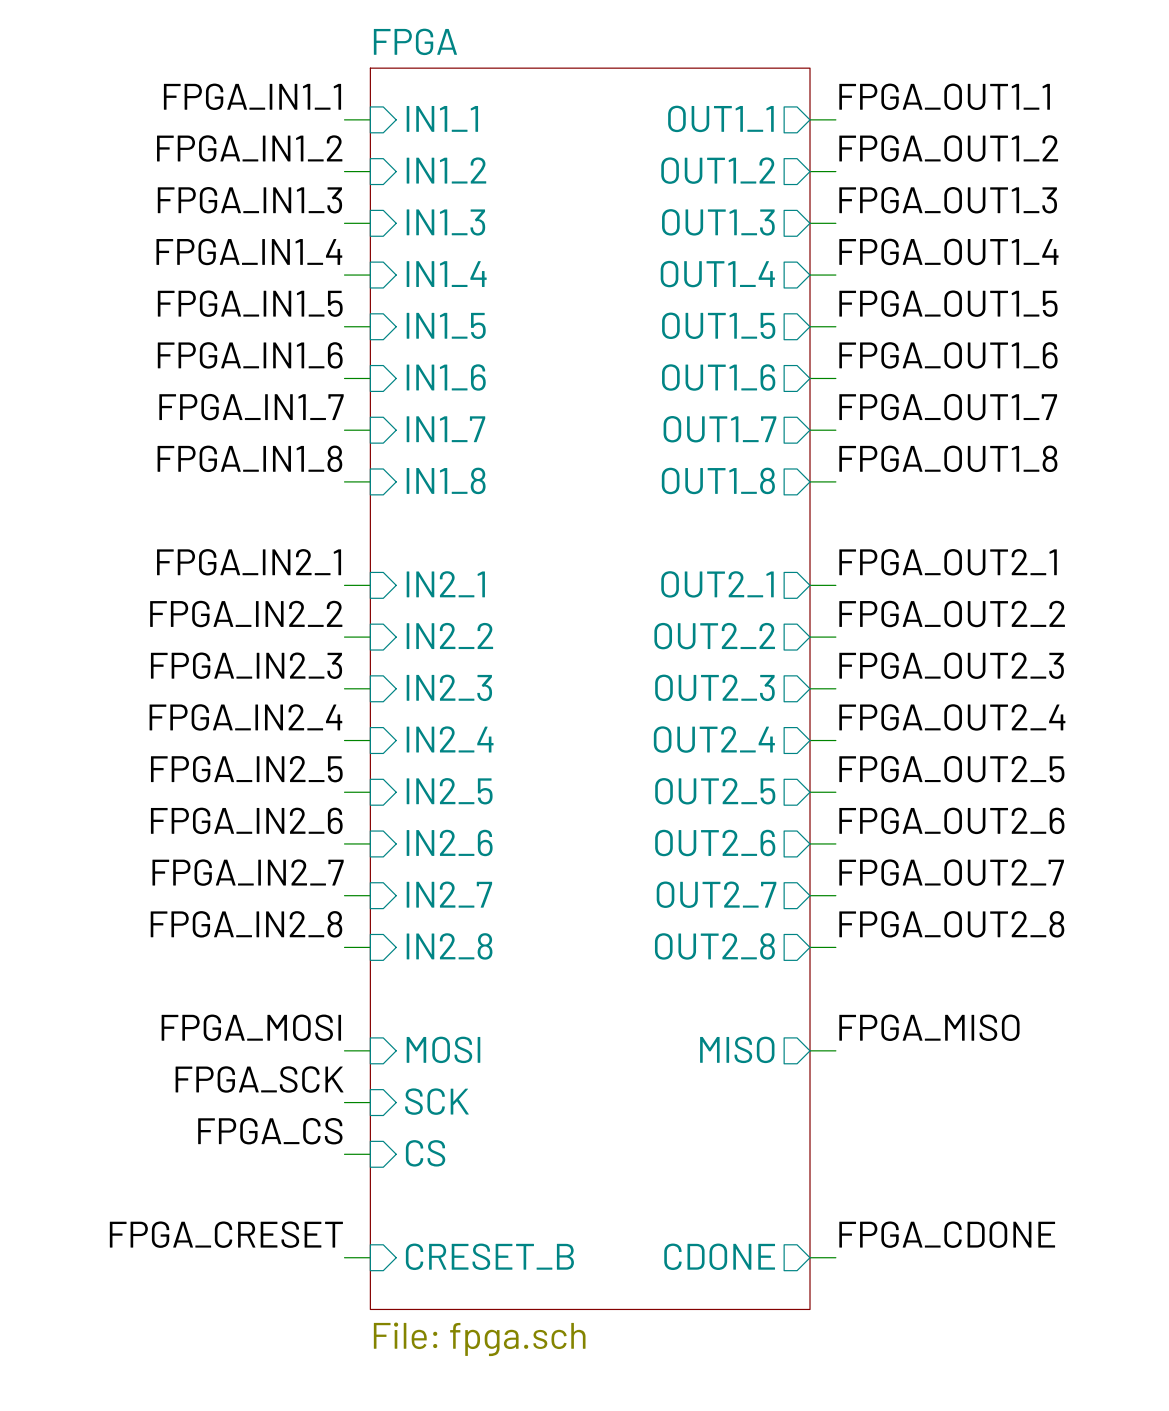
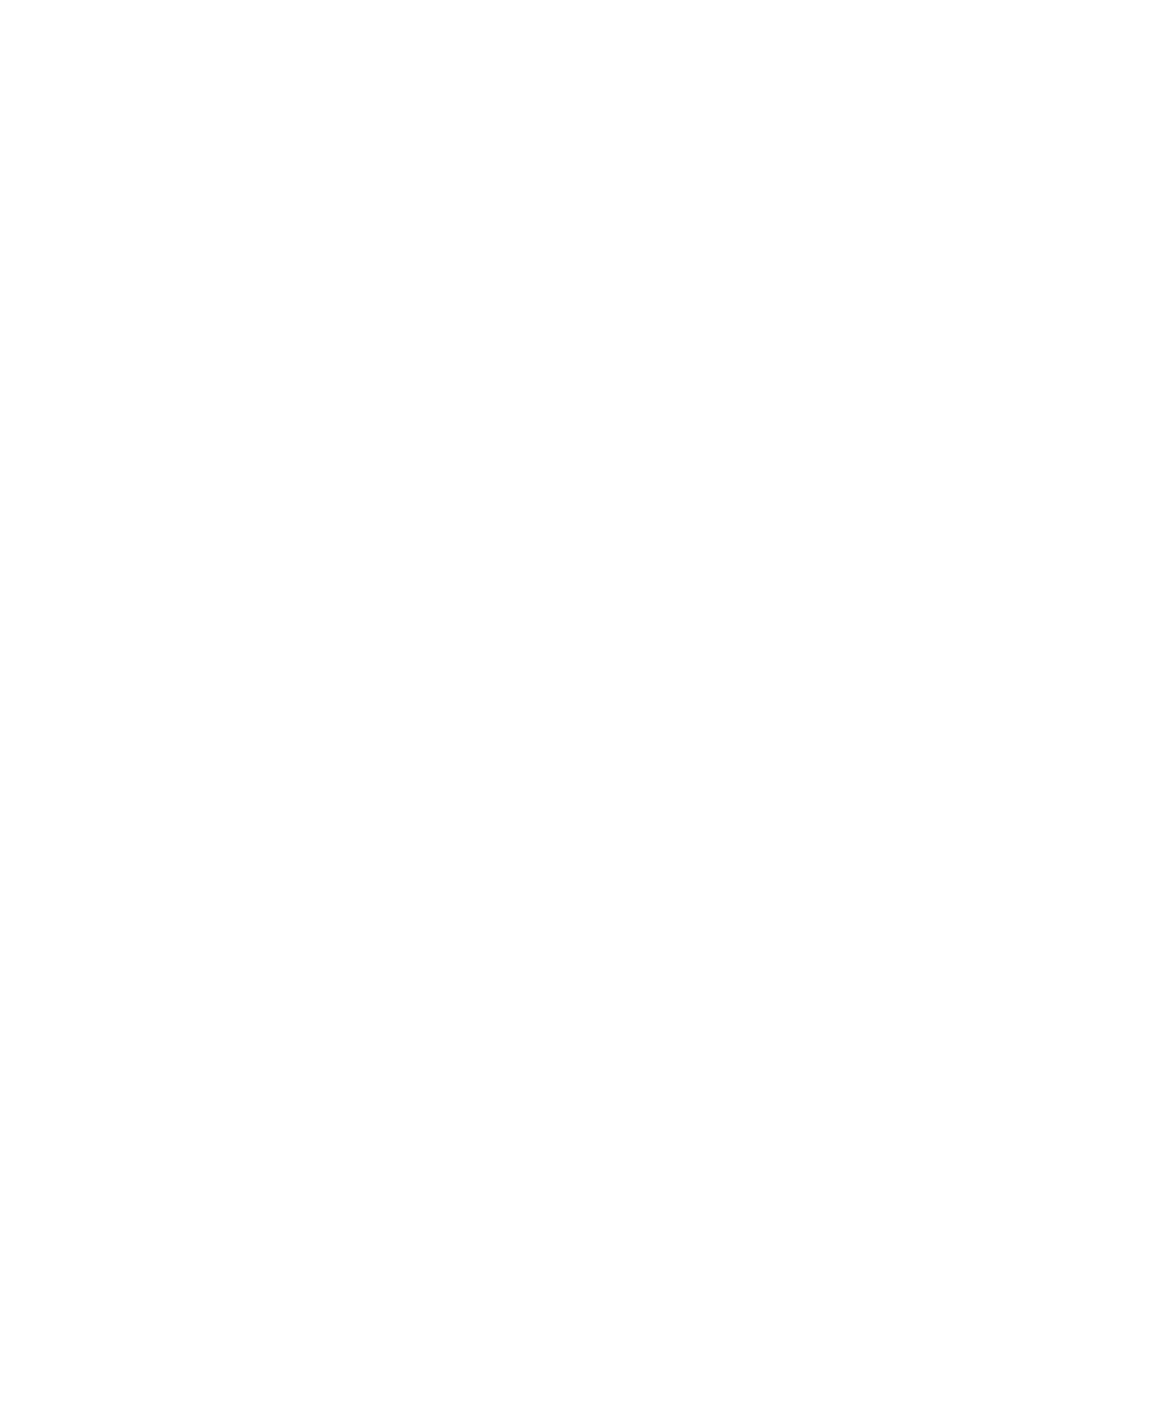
label: FPGA_IN1_1 (252, 96) -> none
label: FPGA_OUT1_1 (944, 96) -> none
sheet pin: IN1_1 (442, 118) -> none
sheet pin: OUT1_1 (720, 118) -> none
wire: (344, 119) (370, 119) -> none
wire: (810, 119) (835, 119) -> none
label: FPGA_IN1_2 (249, 148) -> none
label: FPGA_OUT1_2 (948, 148) -> none
sheet pin: IN1_2 (446, 170) -> none
sheet pin: OUT1_2 (718, 170) -> none
wire: (344, 171) (370, 171) -> none
wire: (810, 171) (835, 171) -> none
label: FPGA_IN1_3 (249, 200) -> none
label: FPGA_OUT1_3 (948, 200) -> none
sheet pin: IN1_3 (445, 222) -> none
sheet pin: OUT1_3 (718, 222) -> none
wire: (344, 223) (370, 223) -> none
wire: (810, 223) (835, 223) -> none
label: FPGA_IN1_4 (249, 251) -> none
label: FPGA_OUT1_4 (948, 251) -> none
sheet pin: IN1_4 (446, 274) -> none
sheet pin: OUT1_4 (717, 274) -> none
wire: (344, 275) (370, 275) -> none
wire: (810, 275) (835, 275) -> none
label: FPGA_IN1_5 (250, 303) -> none
label: FPGA_OUT1_5 (948, 303) -> none
sheet pin: IN1_5 (446, 325) -> none
sheet pin: OUT1_5 (718, 325) -> none
wire: (344, 326) (370, 326) -> none
wire: (810, 326) (835, 326) -> none
label: FPGA_IN1_6 (250, 355) -> none
label: FPGA_OUT1_6 (948, 355) -> none
sheet pin: IN1_6 (446, 377) -> none
sheet pin: OUT1_6 (718, 377) -> none
wire: (344, 378) (370, 378) -> none
wire: (810, 378) (835, 378) -> none
label: FPGA_IN1_7 (251, 407) -> none
label: FPGA_OUT1_7 (948, 407) -> none
sheet pin: IN1_7 (445, 429) -> none
sheet pin: OUT1_7 (719, 429) -> none
wire: (344, 430) (370, 430) -> none
wire: (810, 430) (835, 430) -> none
label: FPGA_IN1_8 (249, 458) -> none
label: FPGA_OUT1_8 (948, 458) -> none
sheet pin: IN1_8 (446, 480) -> none
sheet pin: OUT1_8 (718, 480) -> none
wire: (344, 481) (370, 481) -> none
wire: (810, 481) (835, 481) -> none
label: FPGA_IN2_1 (249, 562) -> none
label: FPGA_OUT2_1 (948, 562) -> none
sheet pin: IN2_1 (445, 584) -> none
sheet pin: OUT2_1 (717, 584) -> none
wire: (344, 585) (370, 585) -> none
wire: (810, 585) (835, 585) -> none
label: FPGA_IN2_2 (246, 614) -> none
label: FPGA_OUT2_2 (952, 614) -> none
sheet pin: IN2_2 (449, 635) -> none
sheet pin: OUT2_2 (714, 636) -> none
wire: (344, 637) (370, 637) -> none
wire: (810, 637) (835, 637) -> none
label: FPGA_IN2_3 (246, 665) -> none
label: FPGA_OUT2_3 (951, 665) -> none
sheet pin: IN2_3 (449, 687) -> none
sheet pin: OUT2_3 (714, 687) -> none
wire: (344, 688) (370, 688) -> none
sheet FPGA: File: fpga.sch (590, 688) -> none
wire: (810, 688) (835, 688) -> none
label: FPGA_IN2_4 (245, 717) -> none
label: FPGA_OUT2_4 (952, 717) -> none
sheet pin: IN2_4 (450, 739) -> none
sheet pin: OUT2_4 (714, 739) -> none
wire: (344, 740) (370, 740) -> none
wire: (810, 740) (835, 740) -> none
label: FPGA_IN2_5 (246, 769) -> none
label: FPGA_OUT2_5 (951, 769) -> none
sheet pin: IN2_5 (449, 791) -> none
sheet pin: OUT2_5 (715, 791) -> none
wire: (344, 792) (370, 792) -> none
wire: (810, 792) (835, 792) -> none
label: FPGA_IN2_6 (246, 820) -> none
label: FPGA_OUT2_6 (951, 820) -> none
sheet pin: IN2_6 (449, 842) -> none
wire: (344, 843) (370, 843) -> none
sheet pin: OUT2_6 (715, 843) -> none
wire: (810, 843) (835, 843) -> none
label: FPGA_IN2_7 (248, 872) -> none
label: FPGA_OUT2_7 (951, 872) -> none
sheet pin: IN2_7 (449, 894) -> none
sheet pin: OUT2_7 (716, 894) -> none
wire: (344, 895) (370, 895) -> none
wire: (810, 895) (835, 895) -> none
label: FPGA_IN2_8 (246, 924) -> none
label: FPGA_OUT2_8 (951, 924) -> none
sheet pin: IN2_8 (449, 946) -> none
sheet pin: OUT2_8 (714, 946) -> none
wire: (344, 947) (370, 947) -> none
wire: (810, 947) (835, 947) -> none
label: FPGA_MOSI (251, 1027) -> none
label: FPGA_MISO (929, 1027) -> none
sheet pin: MOSI (443, 1049) -> none
sheet pin: MISO (737, 1049) -> none
wire: (344, 1050) (370, 1050) -> none
wire: (810, 1050) (835, 1050) -> none
label: FPGA_SCK (259, 1079) -> none
sheet pin: SCK (436, 1101) -> none
wire: (344, 1102) (370, 1102) -> none
label: FPGA_CS (270, 1131) -> none
sheet pin: CS (425, 1153) -> none
wire: (344, 1154) (370, 1154) -> none
label: FPGA_CRESET (226, 1234) -> none
label: FPGA_CDONE (947, 1234) -> none
sheet pin: CRESET_B (489, 1256) -> none
sheet pin: CDONE (719, 1256) -> none
wire: (344, 1257) (370, 1257) -> none
wire: (810, 1257) (835, 1257) -> none

